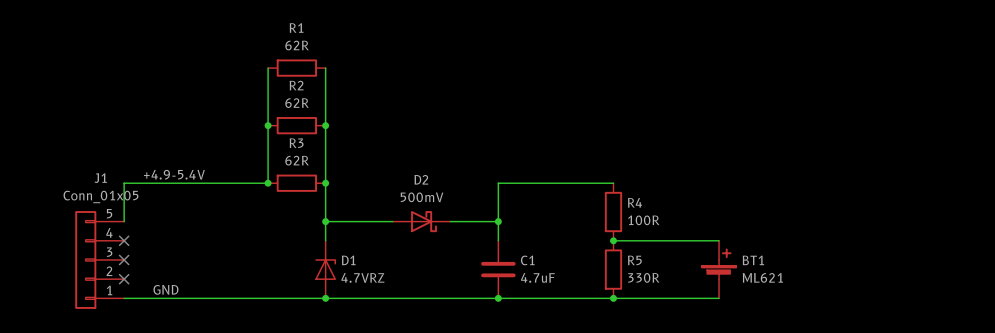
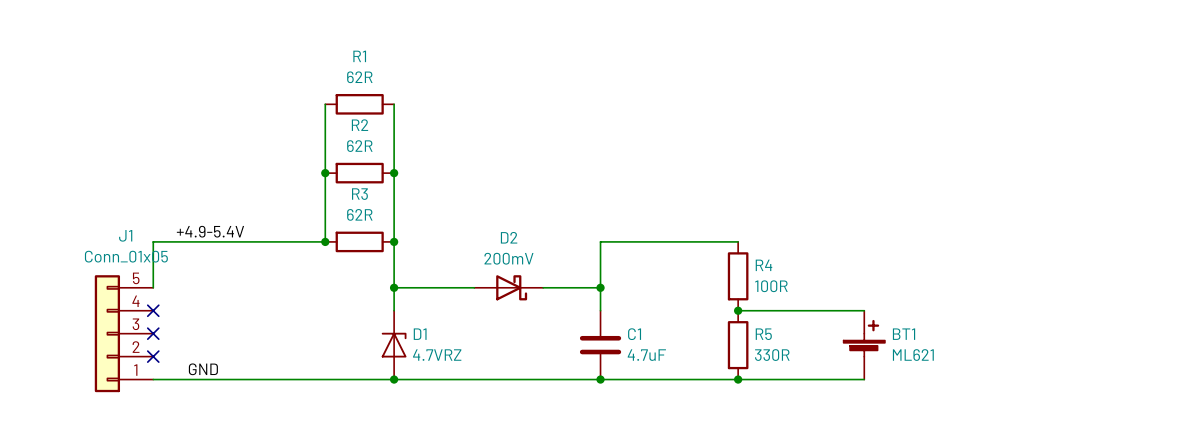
D2 value: 500mV (422, 197) -> 200mV (508, 258)

